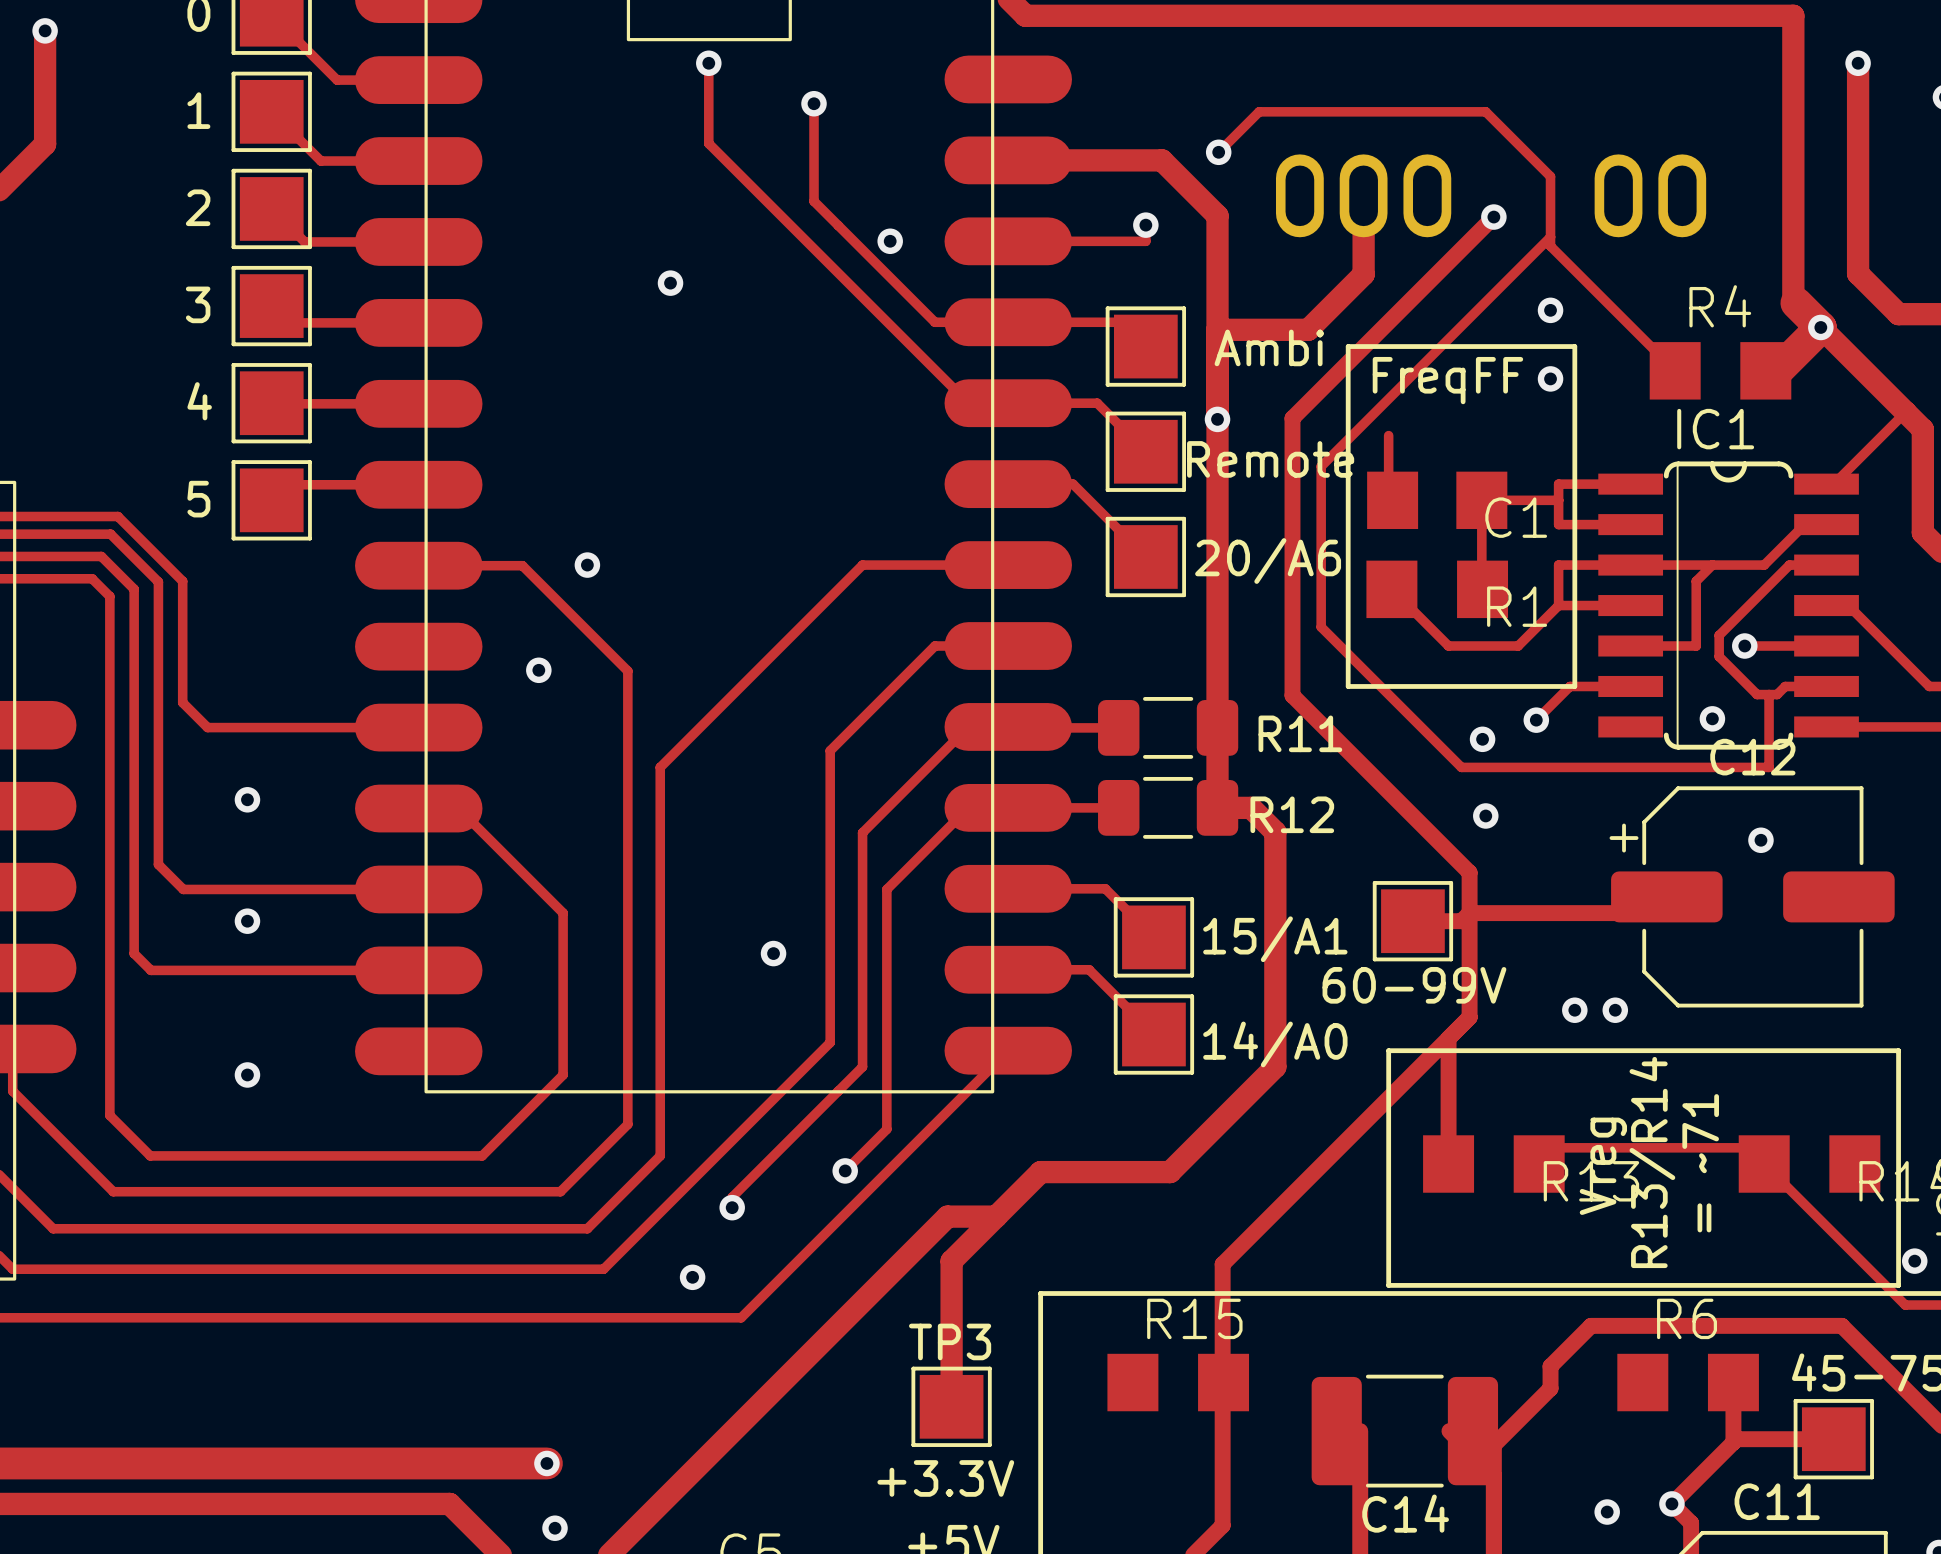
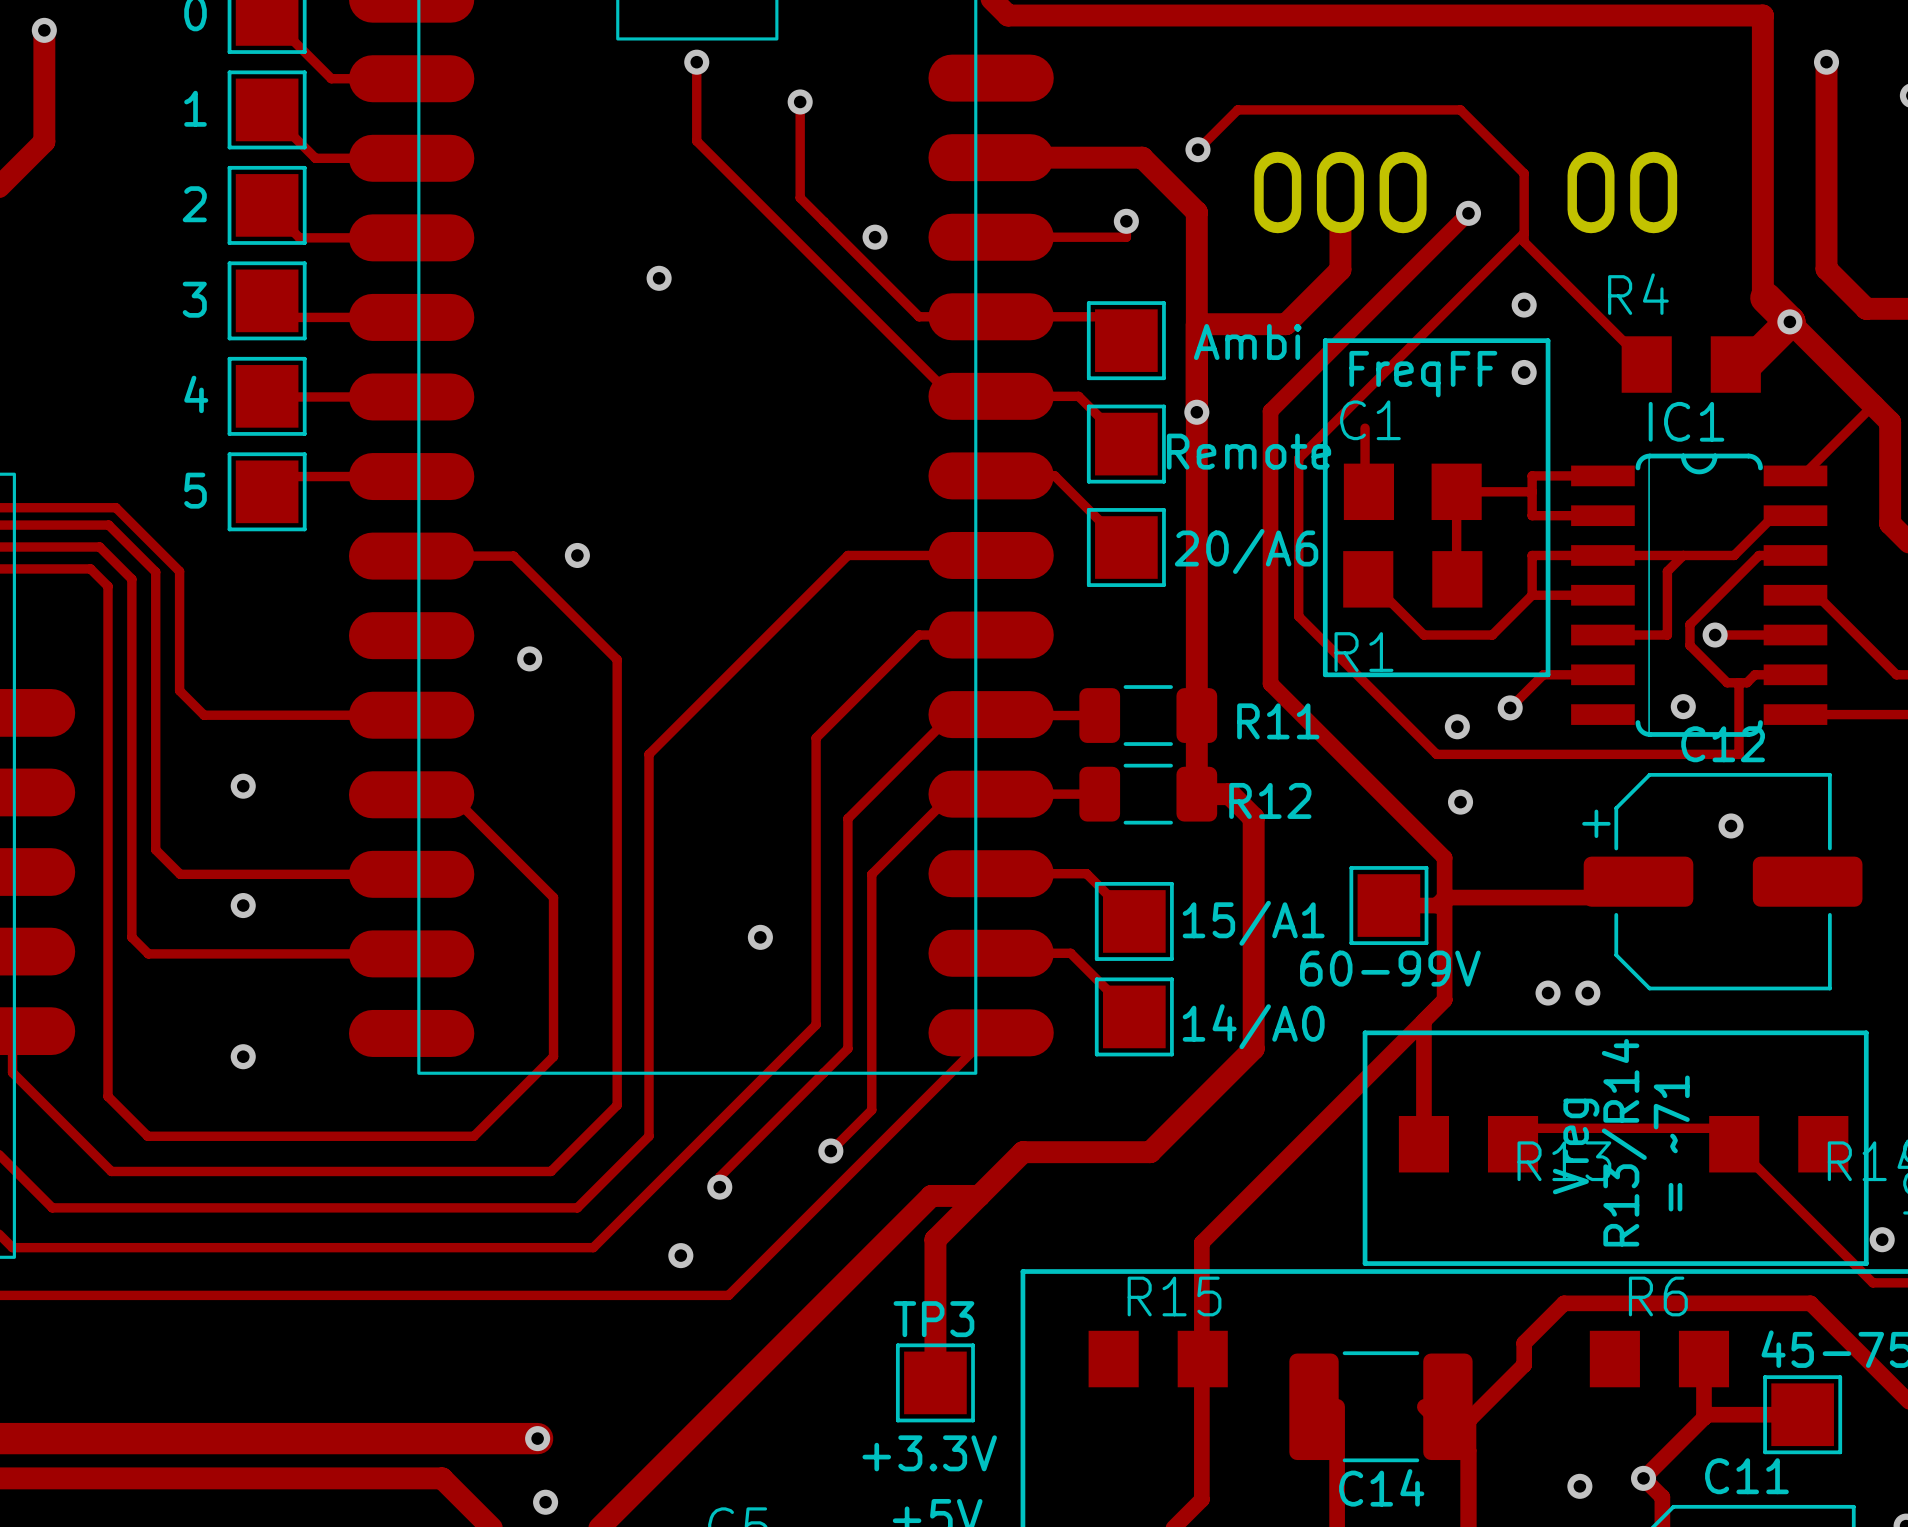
R4 name position: R4 (1720, 306) -> R4 (1638, 294)
C1 name position: C1 (1516, 517) -> C1 (1370, 420)
R1 name position: R1 (1517, 606) -> R1 (1363, 652)

